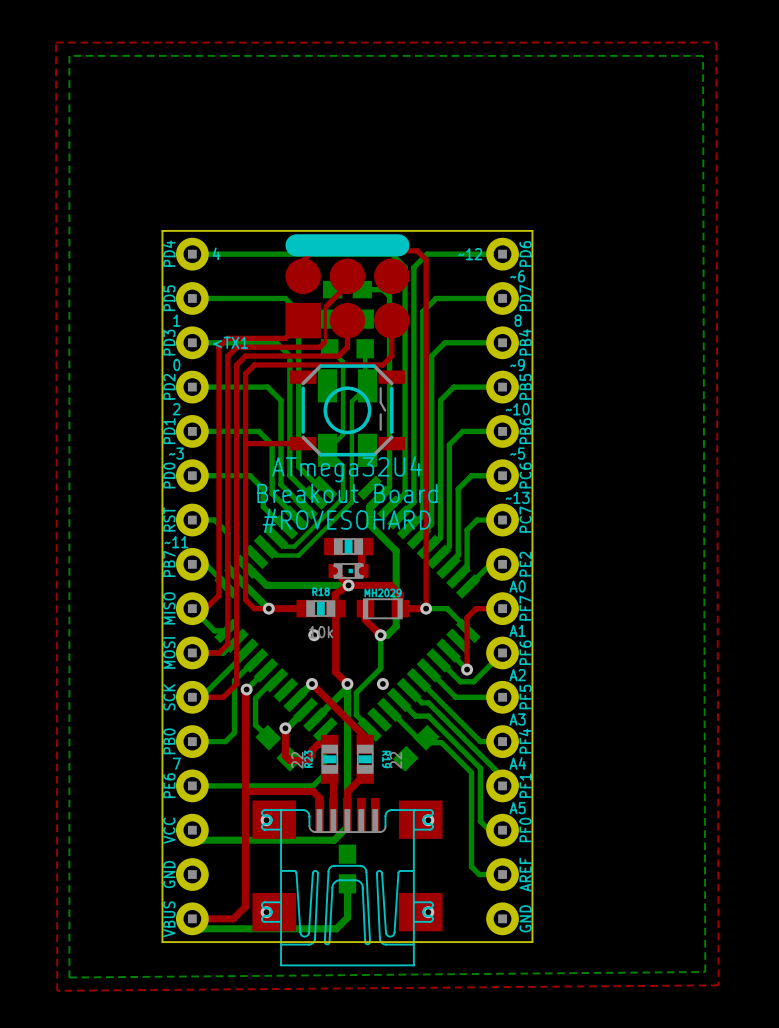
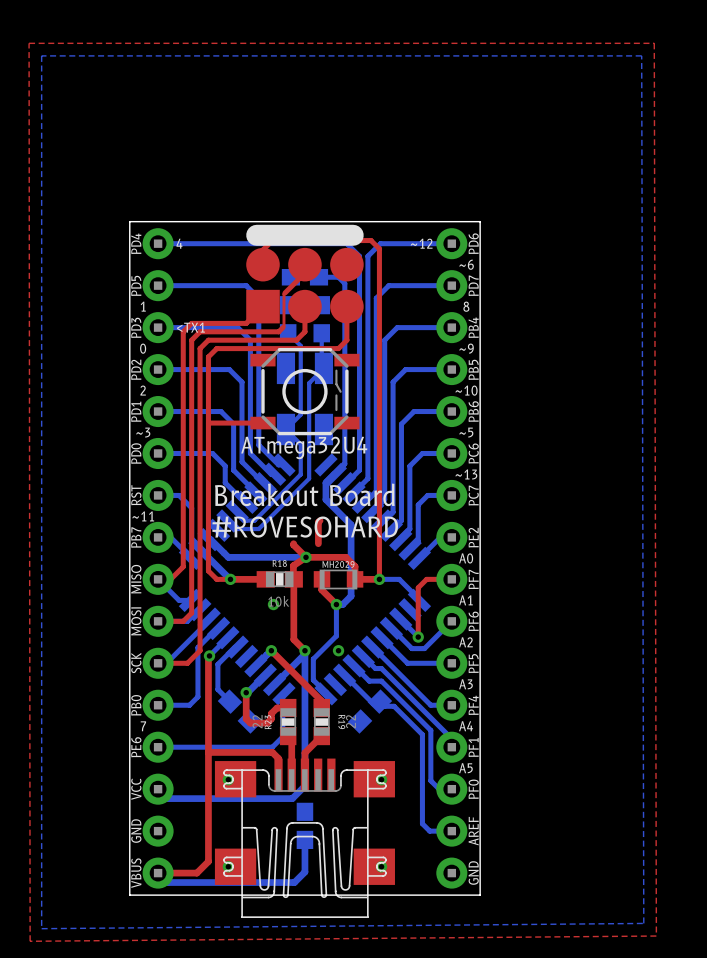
text: Breakout Board (347, 493) -> none
text: #ROVESOHARD (346, 520) -> Breakout Board (304, 494)
part: (348, 546) -> none
text: none -> #ROVESOHARD (305, 527)
part: (348, 570) -> none

